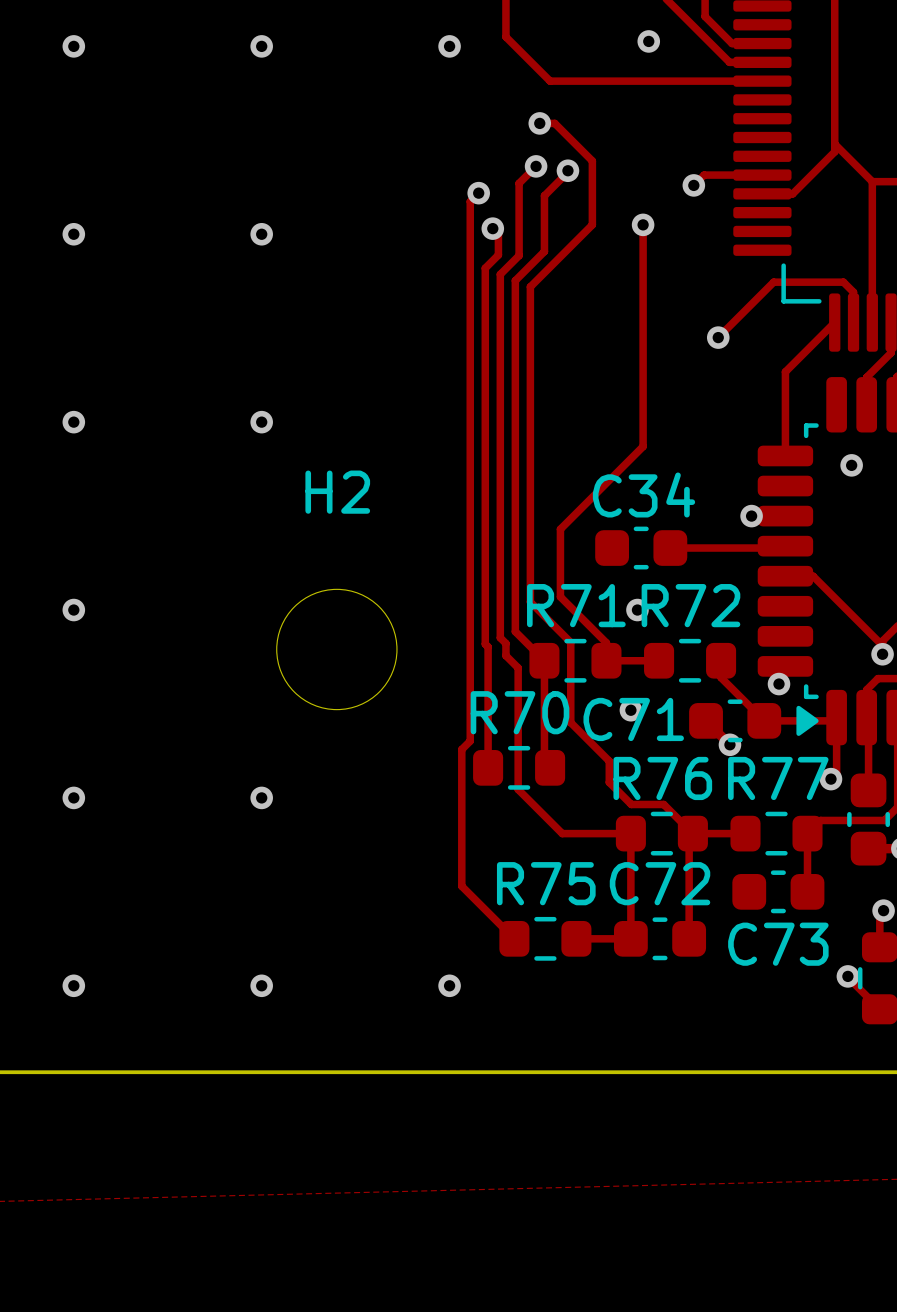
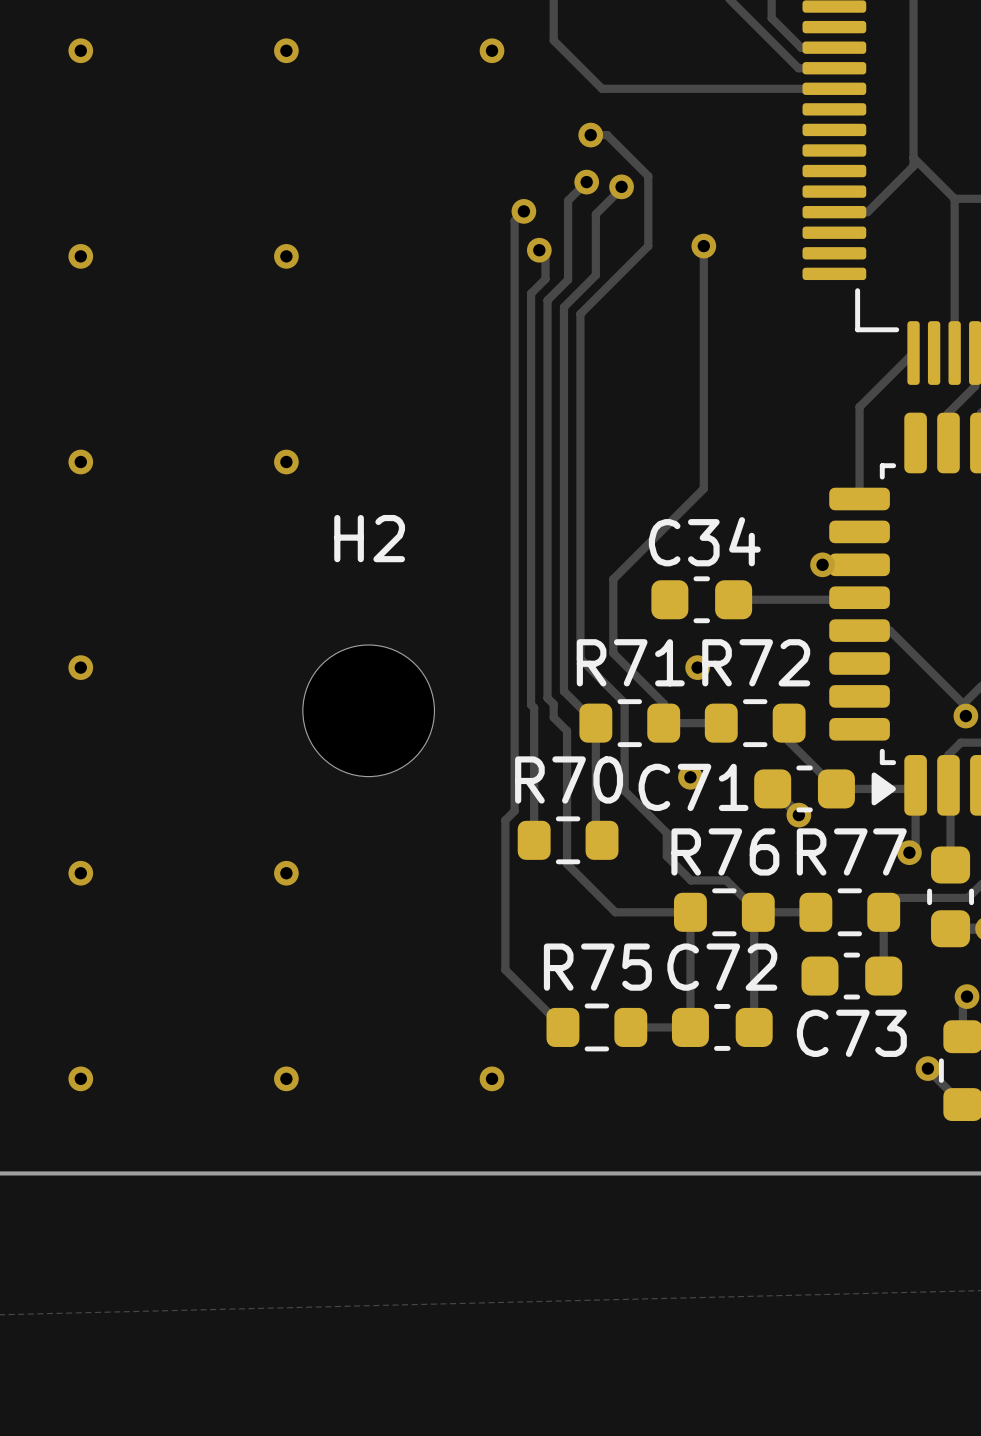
via: (648, 41) -> none
track: (762, 175) (704, 175) (693, 185) -> none
via: (693, 185) -> none
track: (853, 322) (853, 292) (843, 282) (773, 282) (718, 337) -> none
via: (718, 337) -> none
via: (851, 465) -> none
via: (779, 684) -> none

